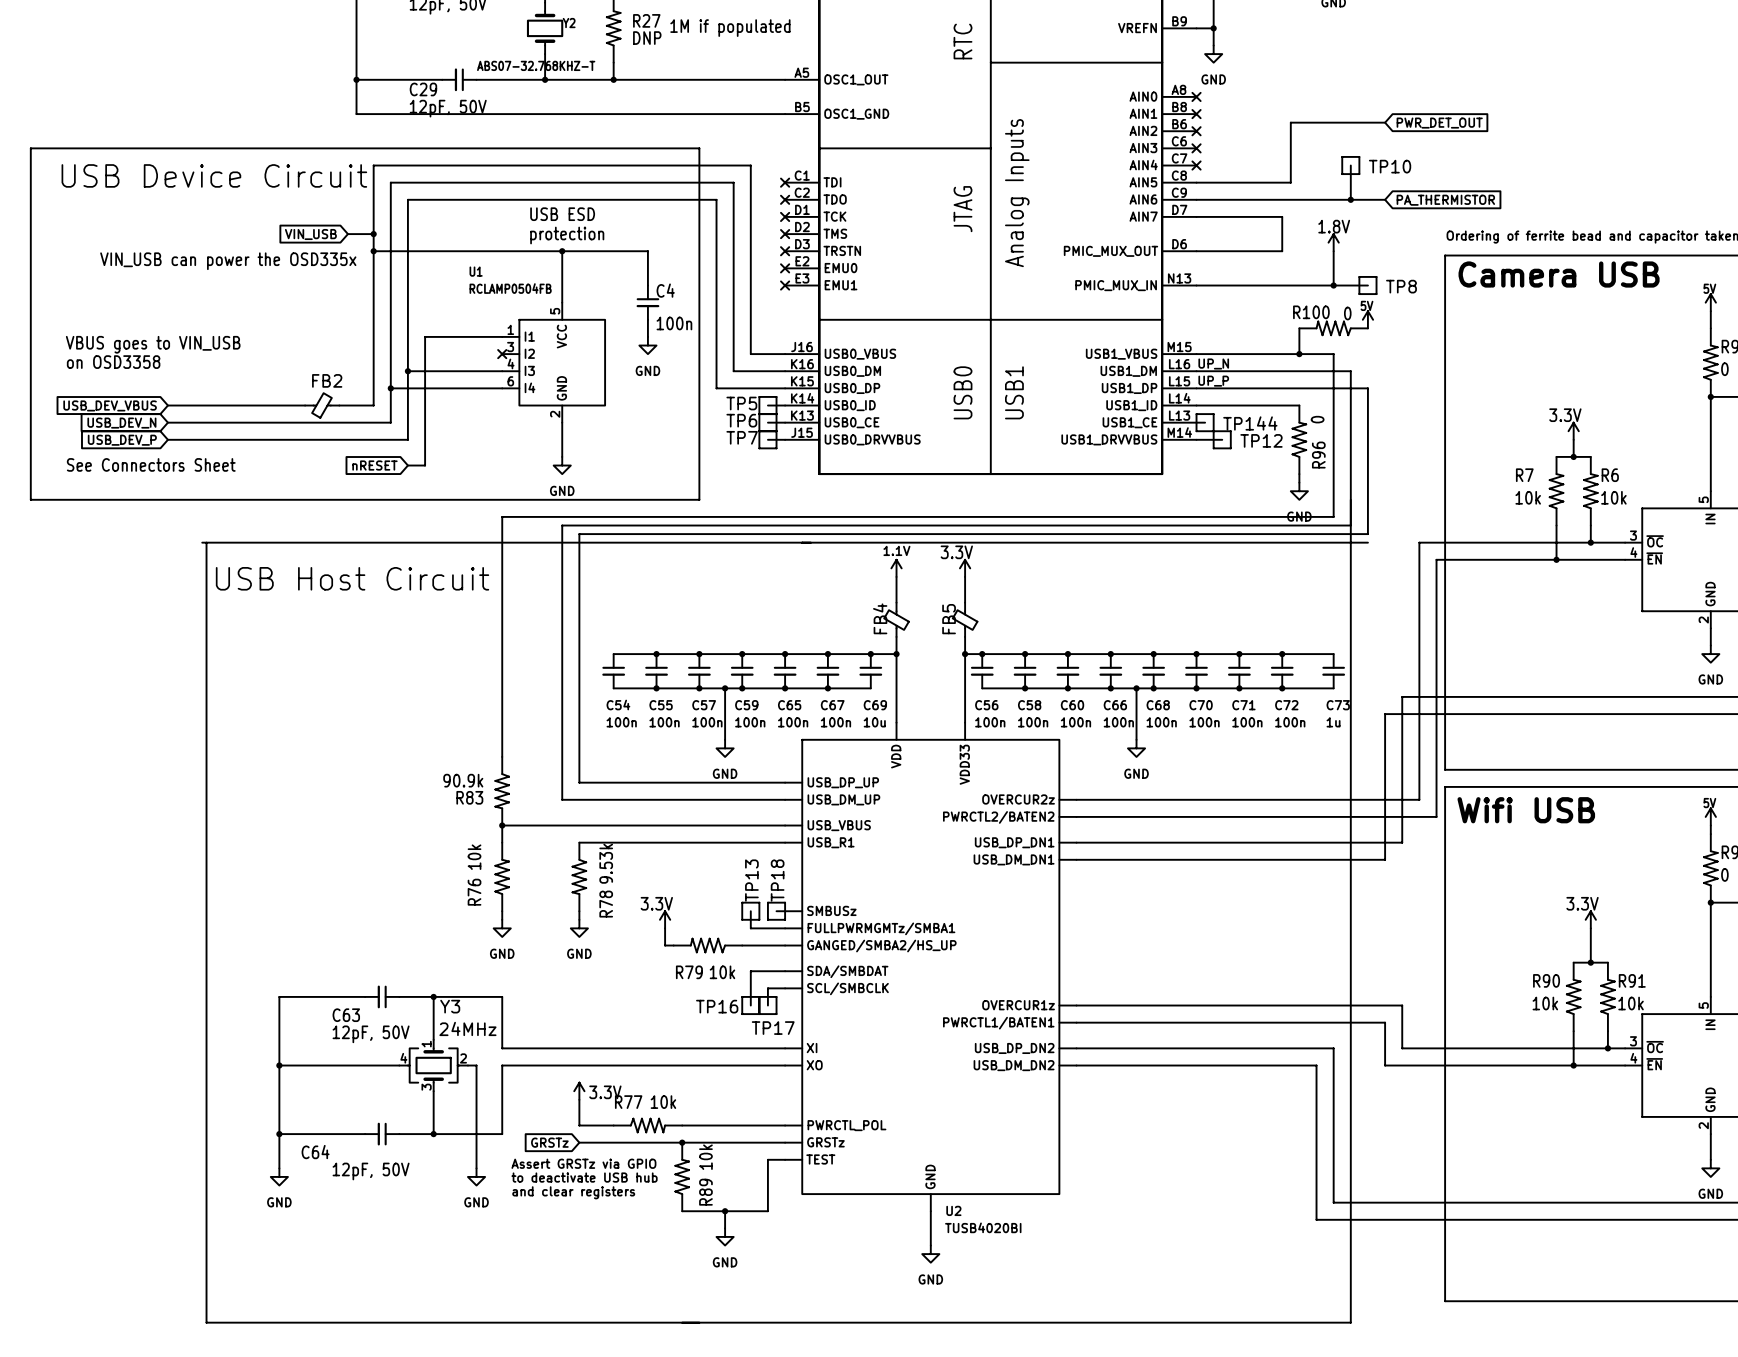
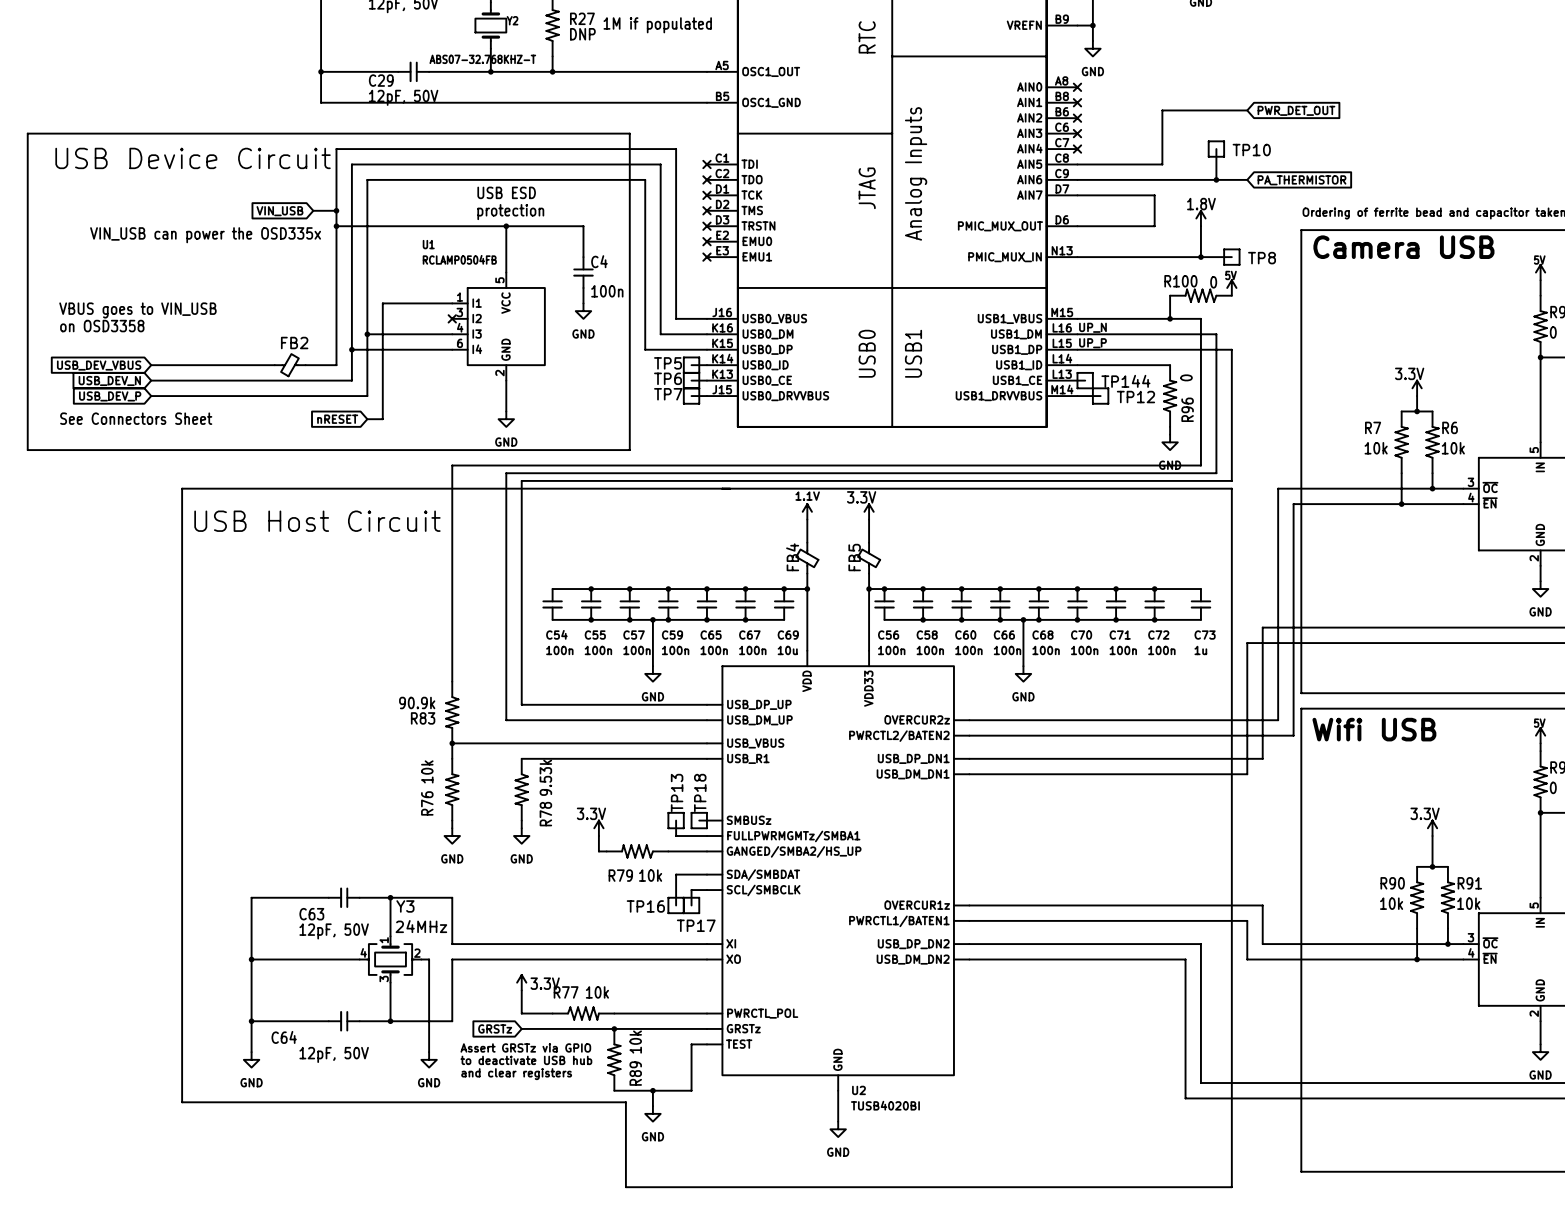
line: (1350, 499) (1350, 1322) (206, 1322) (206, 542) -> none
line: none -> (182, 488) (182, 1102) (625, 1102) (625, 1187) (1231, 1187) (1231, 488)

